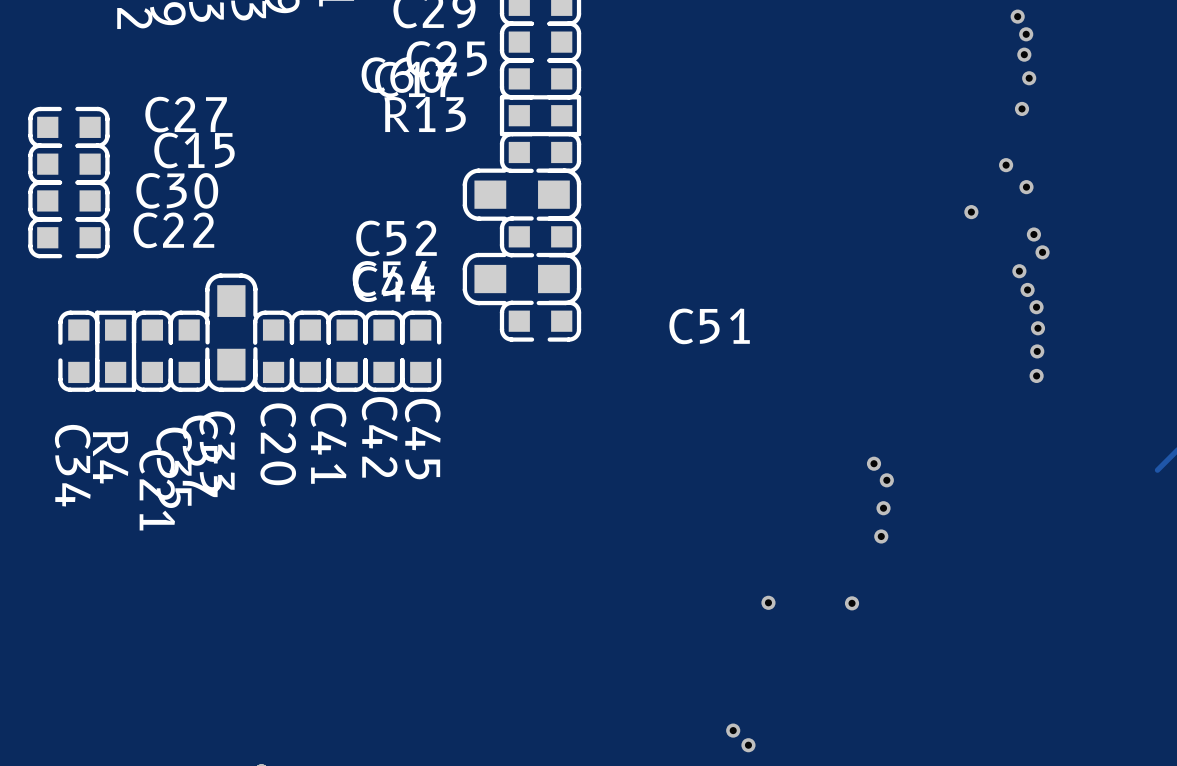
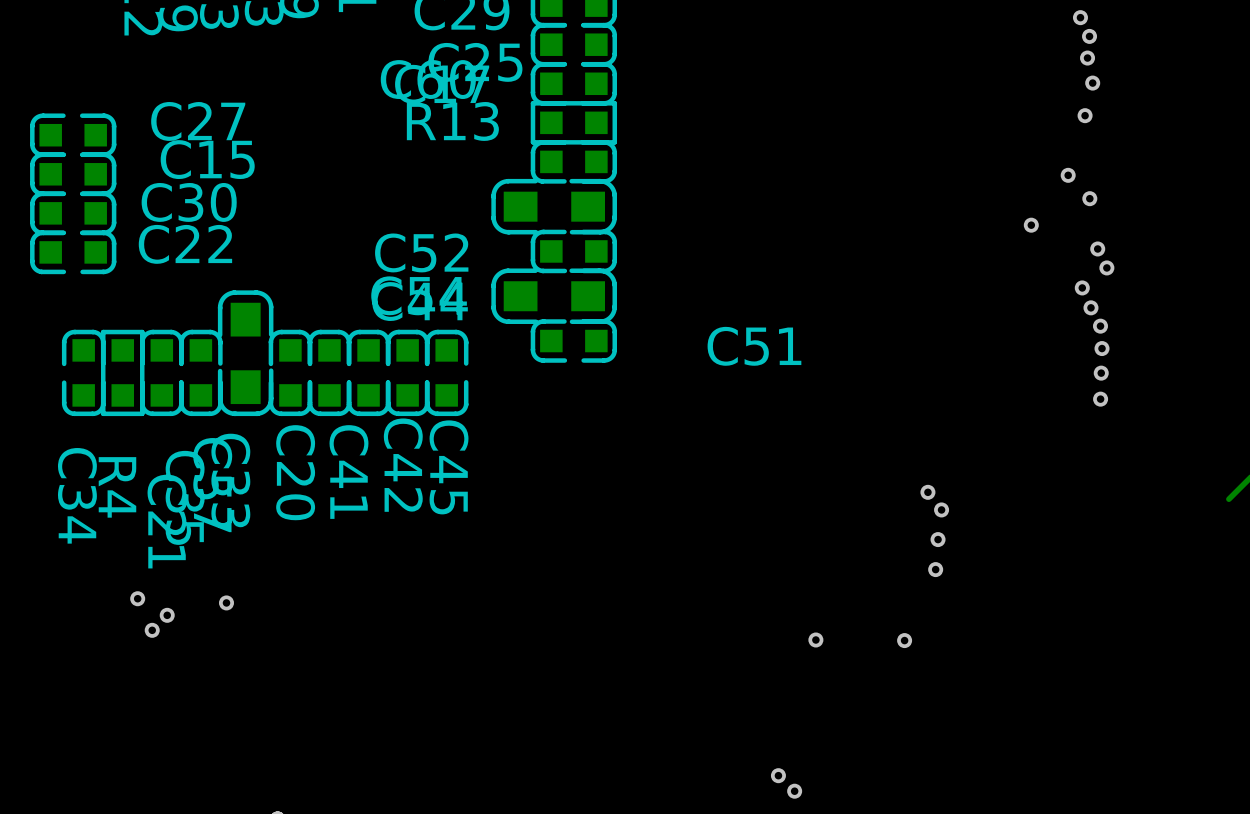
via: none -> (137, 598)
via: none -> (226, 602)
via: none -> (167, 615)
via: none -> (152, 630)

